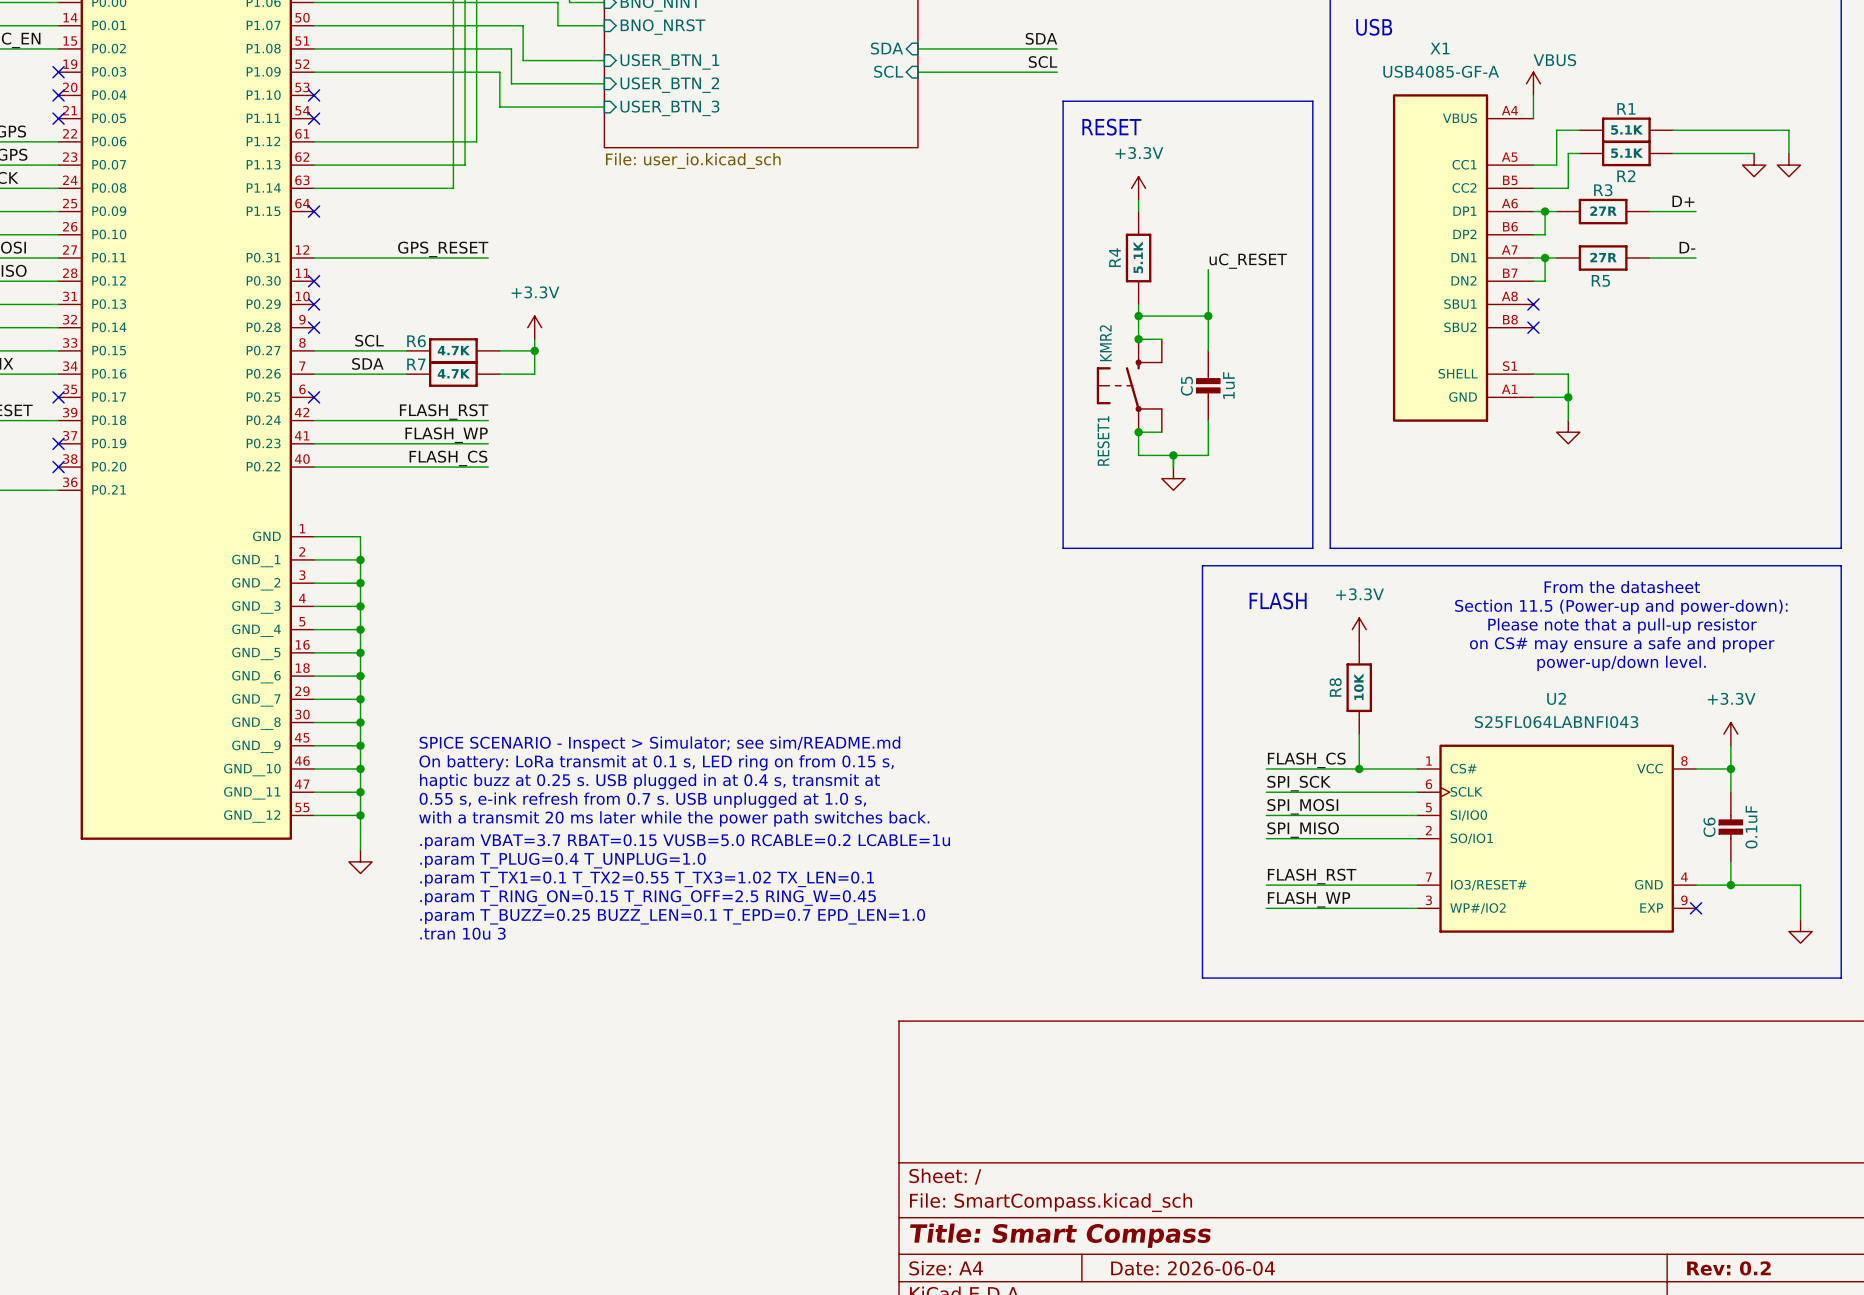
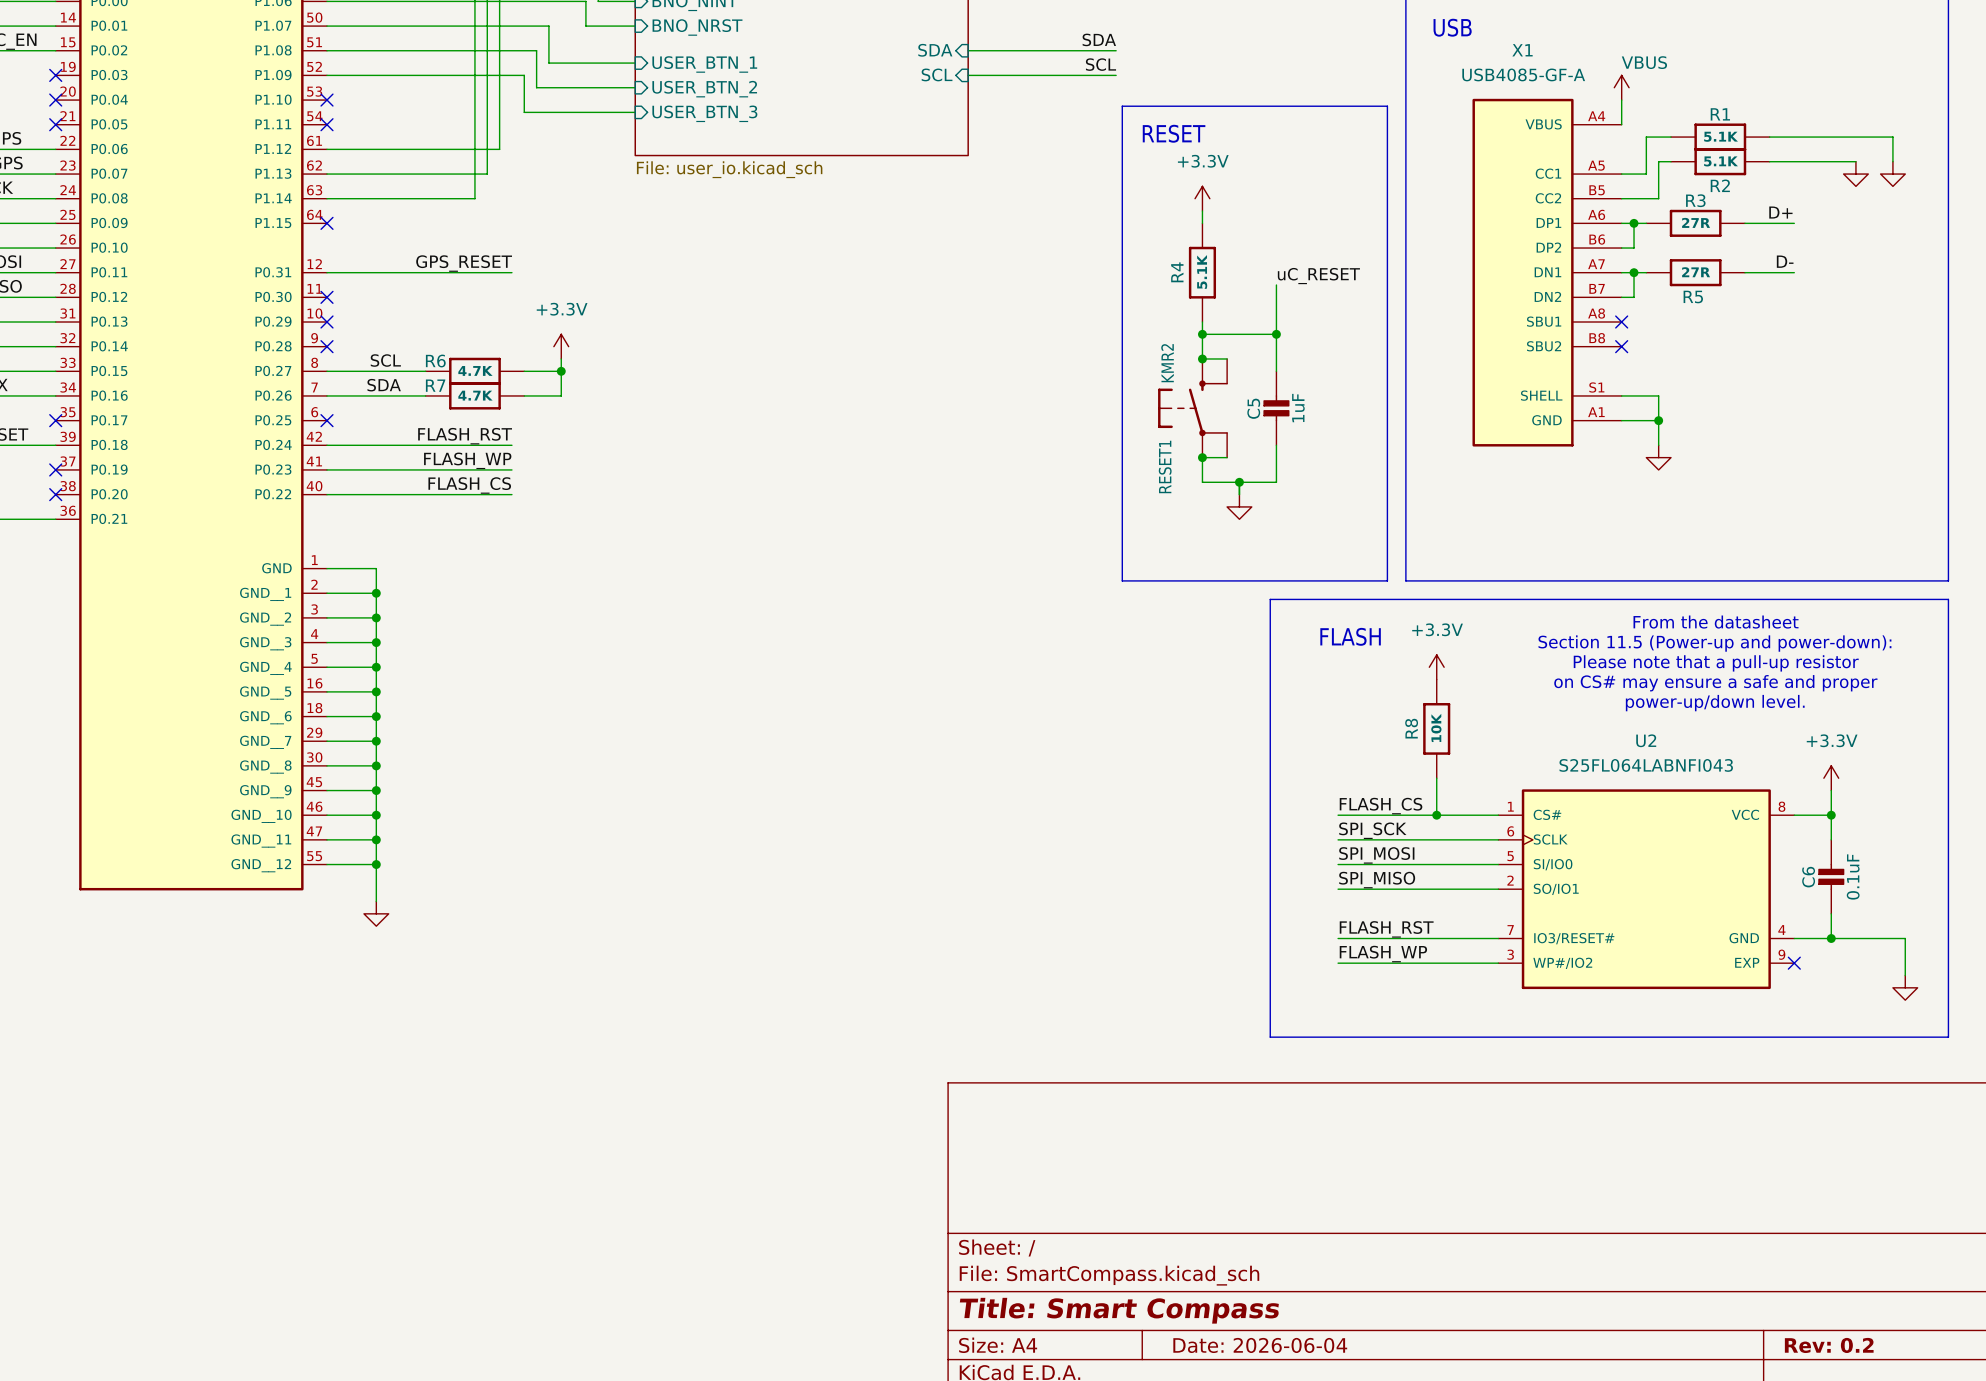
text: SPICE SCENARIO - Inspect > Simulator; see sim/README.md (659, 744) -> none
text: On battery: LoRa transmit at 0.1 s, LED ring on from 0.15 s, (656, 762) -> none
text: haptic buzz at 0.25 s. USB plugged in at 0.4 s, transmit at (649, 781) -> none
text: 0.55 s, e-ink refresh from 0.7 s. USB unplugged at 1.0 s, (642, 800) -> none
text: with a transmit 20 ms later while the power path switches back. (674, 818) -> none
text: .param VBAT=3.7 RBAT=0.15 VUSB=5.0 RCABLE=0.2 LCABLE=1u (685, 841) -> none
text: .param T_PLUG=0.4 T_UNPLUG=1.0 (562, 860) -> none
text: .param T_TX1=0.1 T_TX2=0.55 T_TX3=1.02 TX_LEN=0.1 (647, 879) -> none
text: .param T_RING_ON=0.15 T_RING_OFF=2.5 RING_W=0.45 (648, 898) -> none
text: .param T_BUZZ=0.25 BUZZ_LEN=0.1 T_EPD=0.7 EPD_LEN=1.0 (672, 916) -> none
text: .tran 10u 3 (462, 933) -> none

